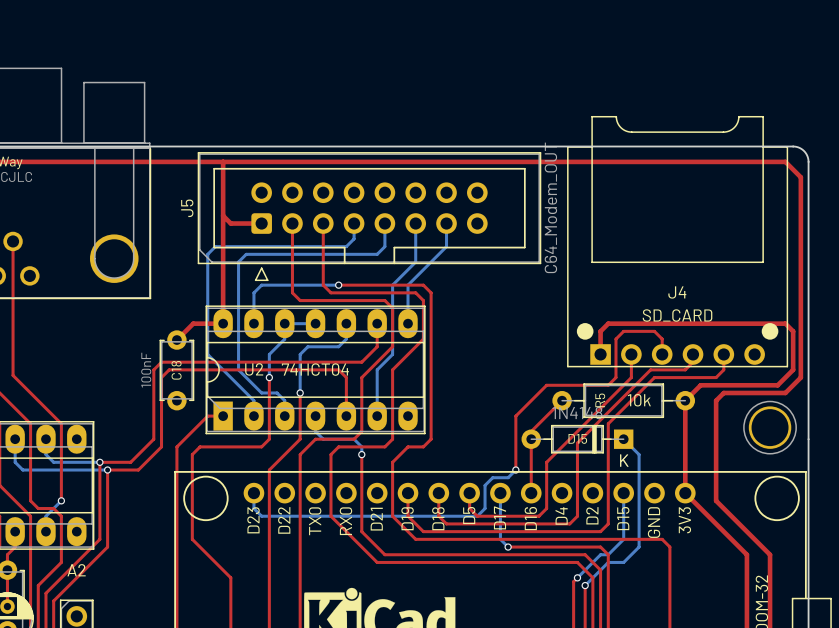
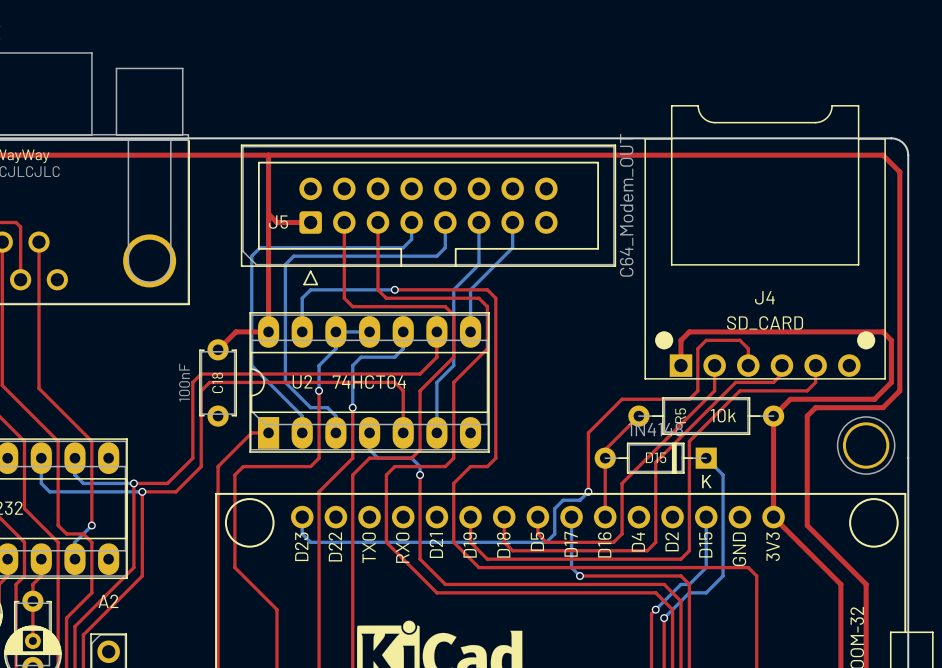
J5 name rotation: 0° (187, 208) -> 90° clockwise (278, 222)
J5 name position: J5 (187, 208) -> J5 (278, 222)

